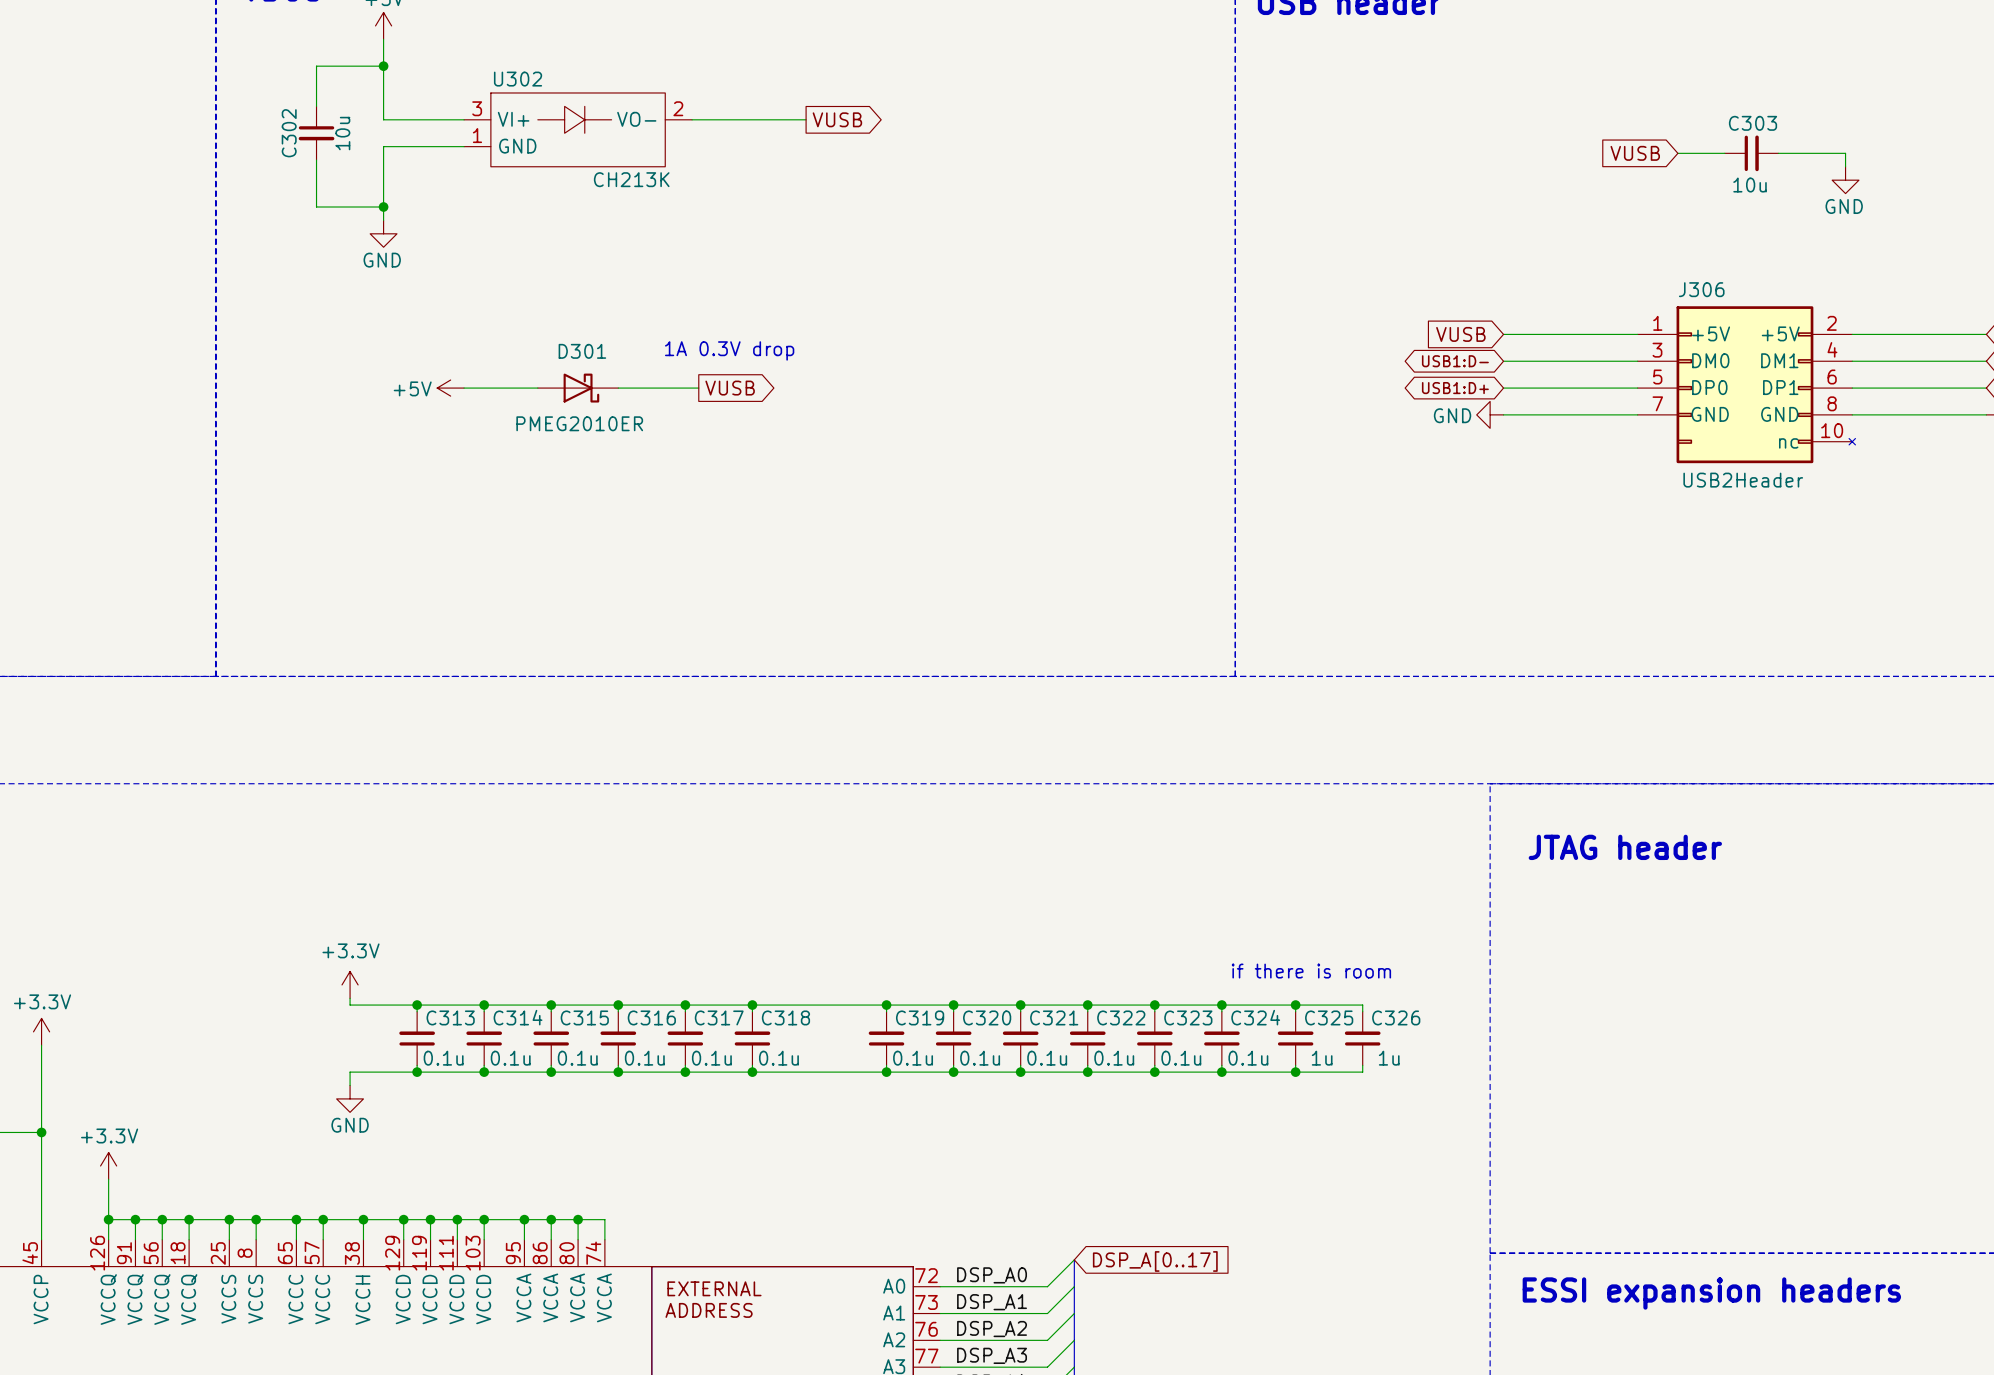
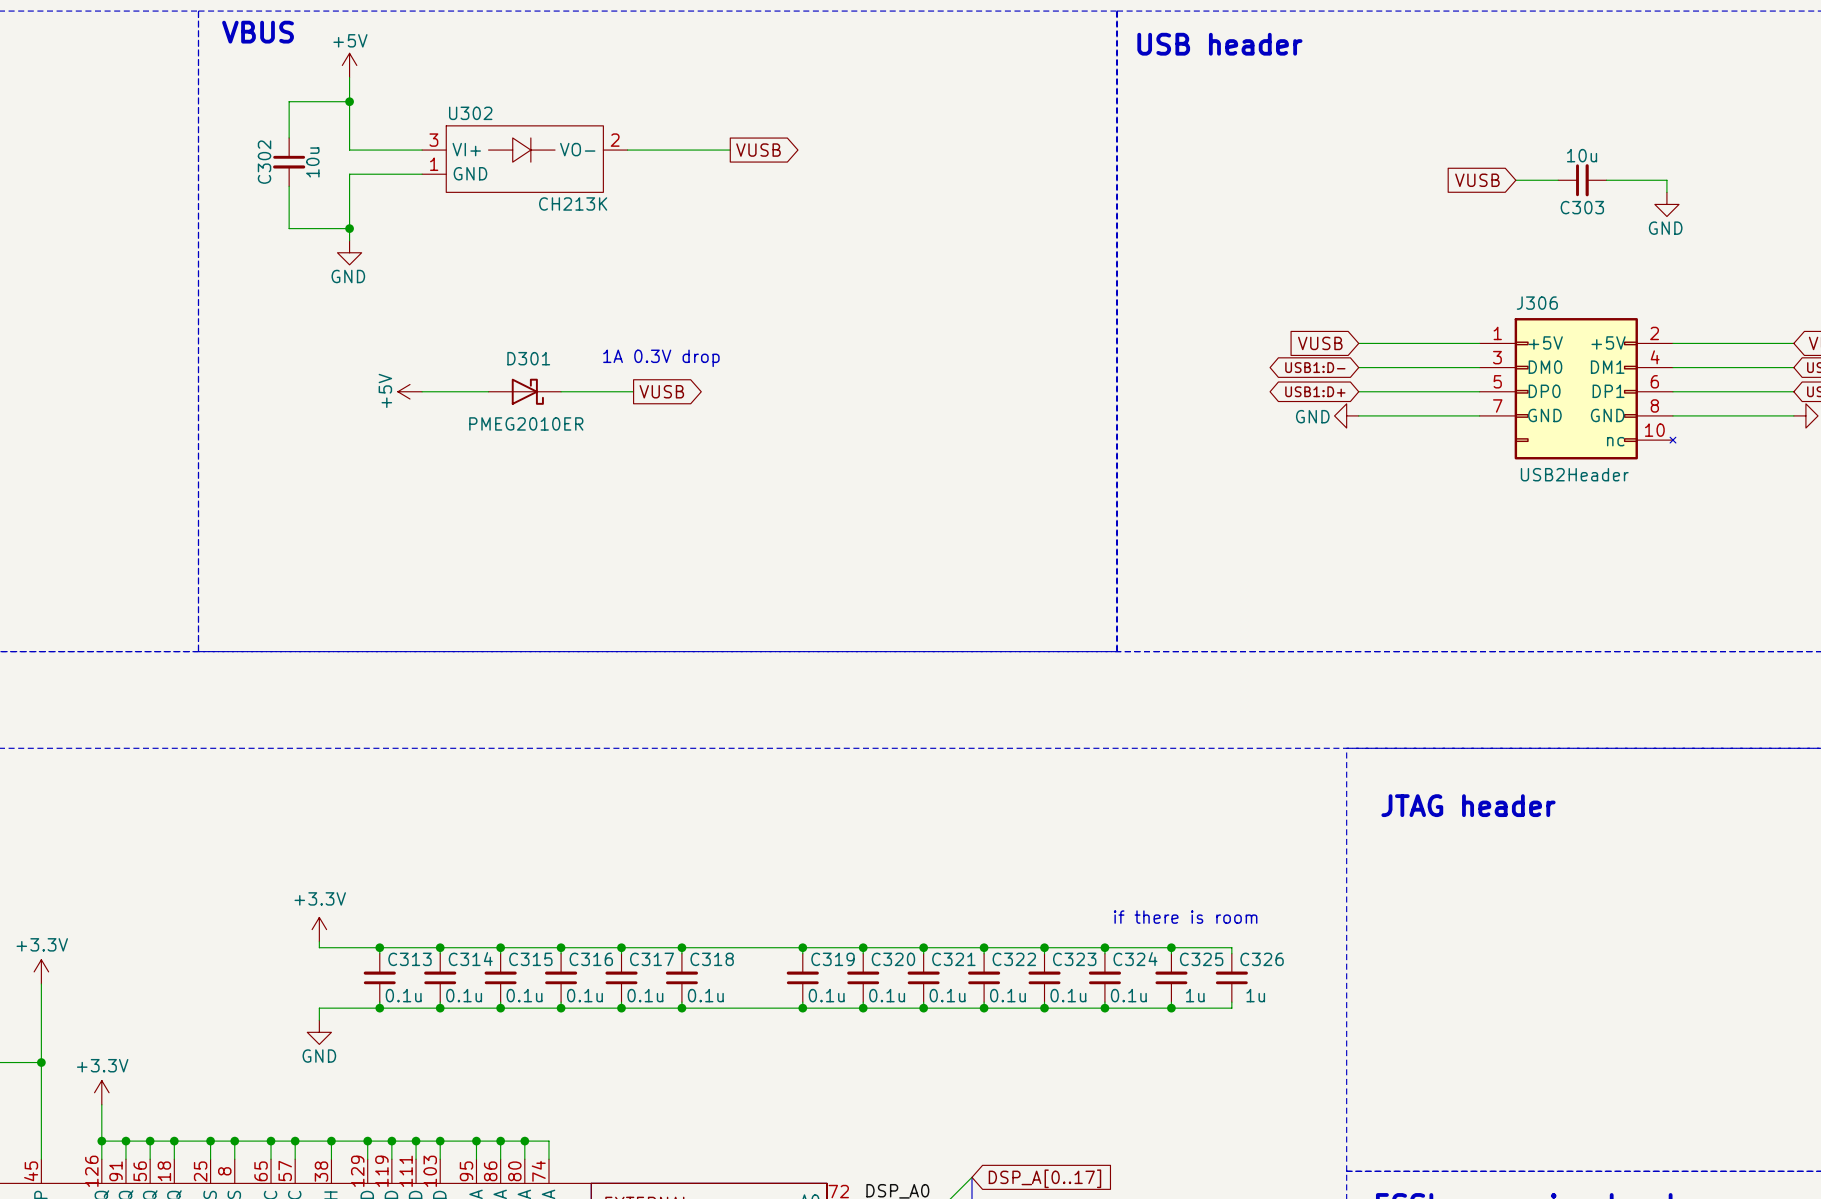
C303 name position: C303 (1753, 123) -> C303 (1582, 207)
C303 value position: 10u (1750, 185) -> 10u (1582, 155)
power symbol text rotation: 0° (412, 388) -> 90° counterclockwise (385, 390)

